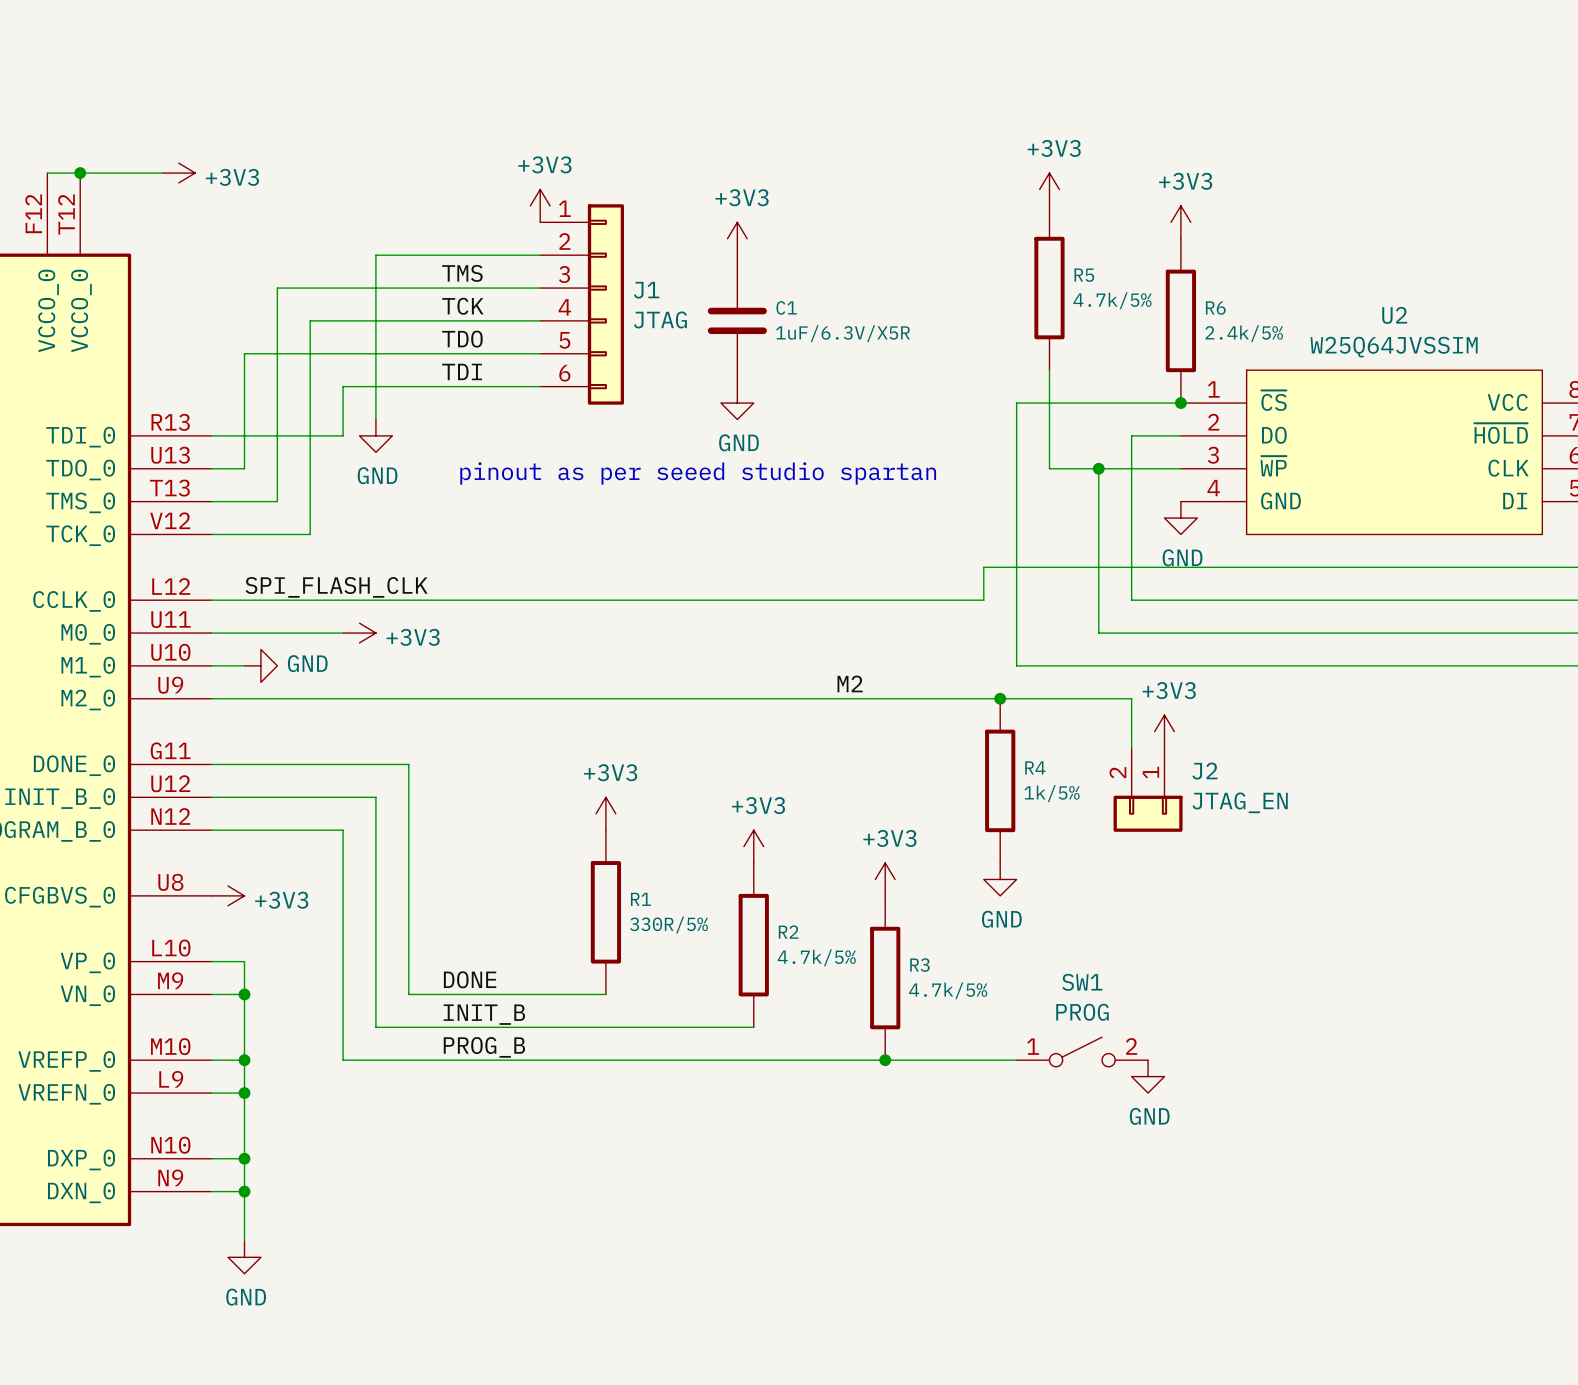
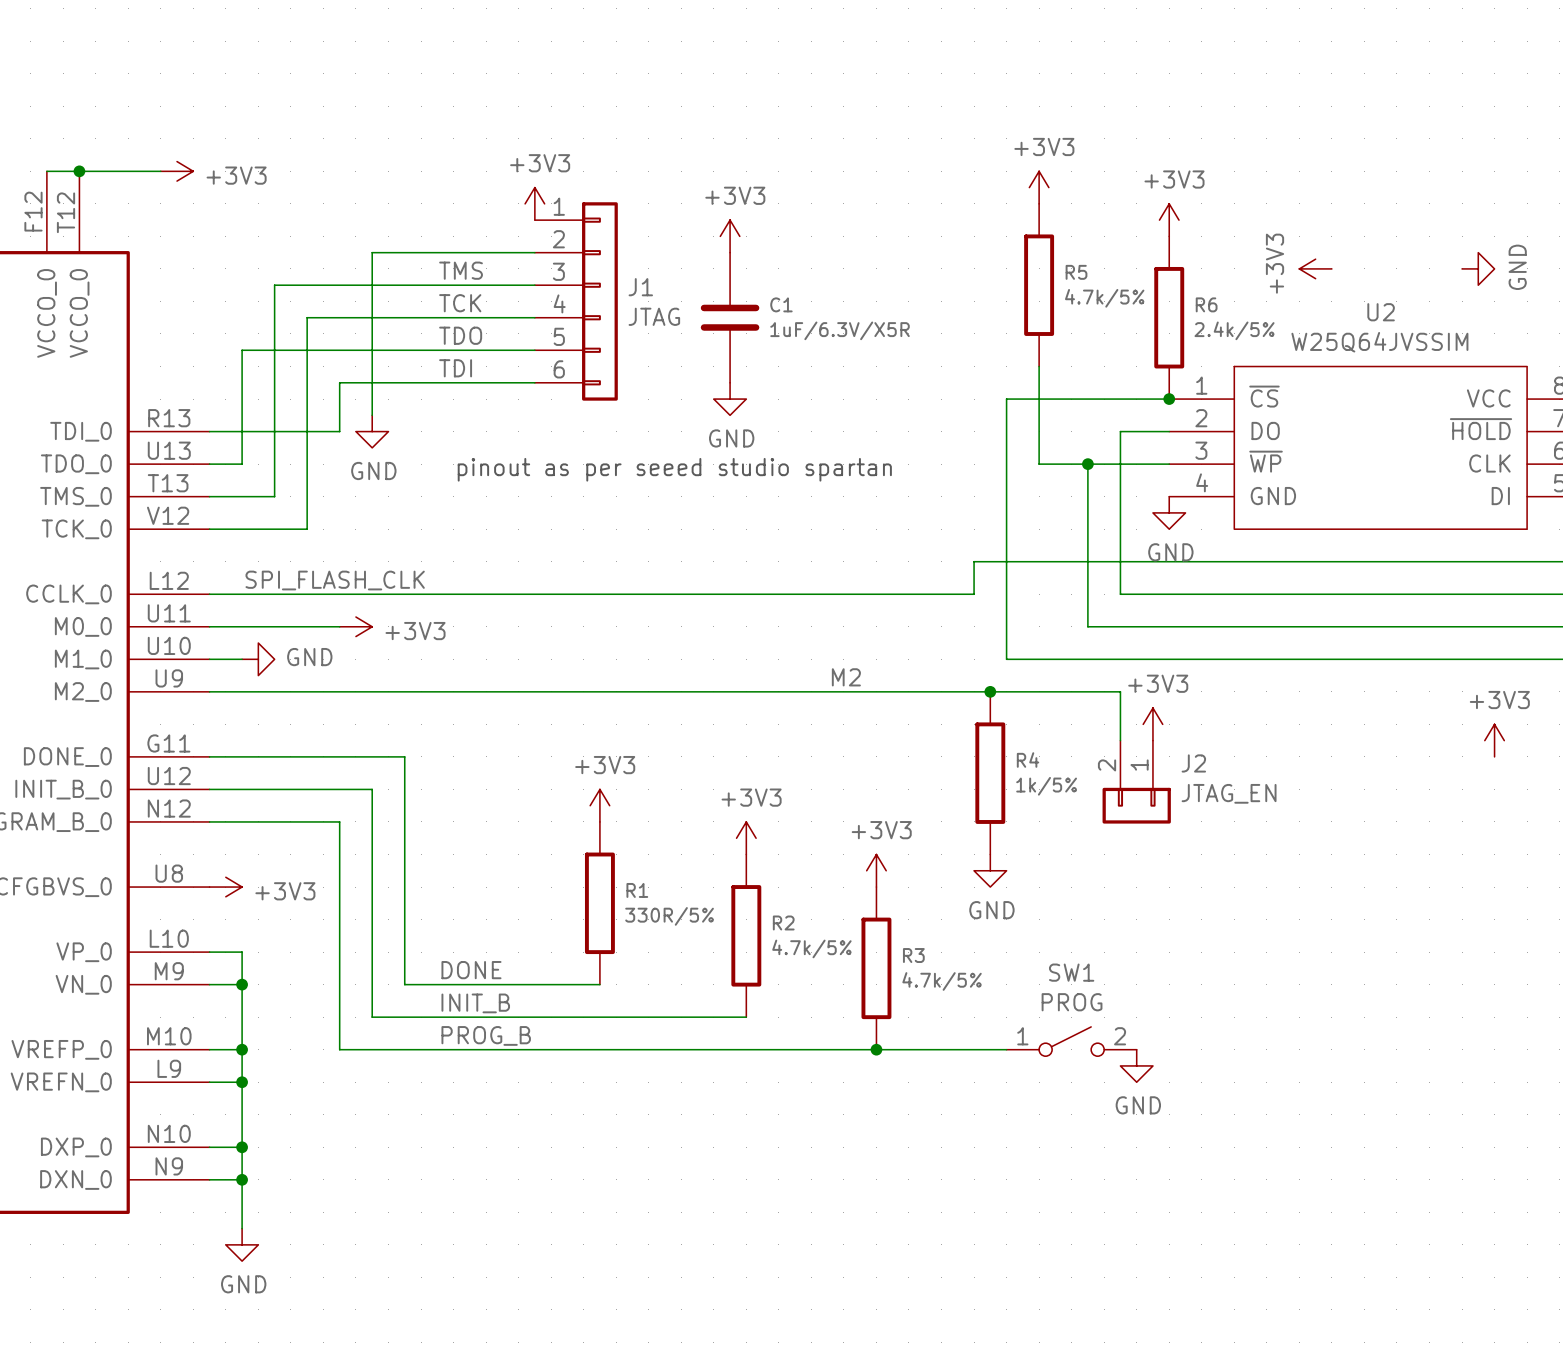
power symbol: none -> +3V3 (1315, 268)
power symbol: none -> GND (1478, 268)
power symbol: none -> +3V3 (1494, 740)

